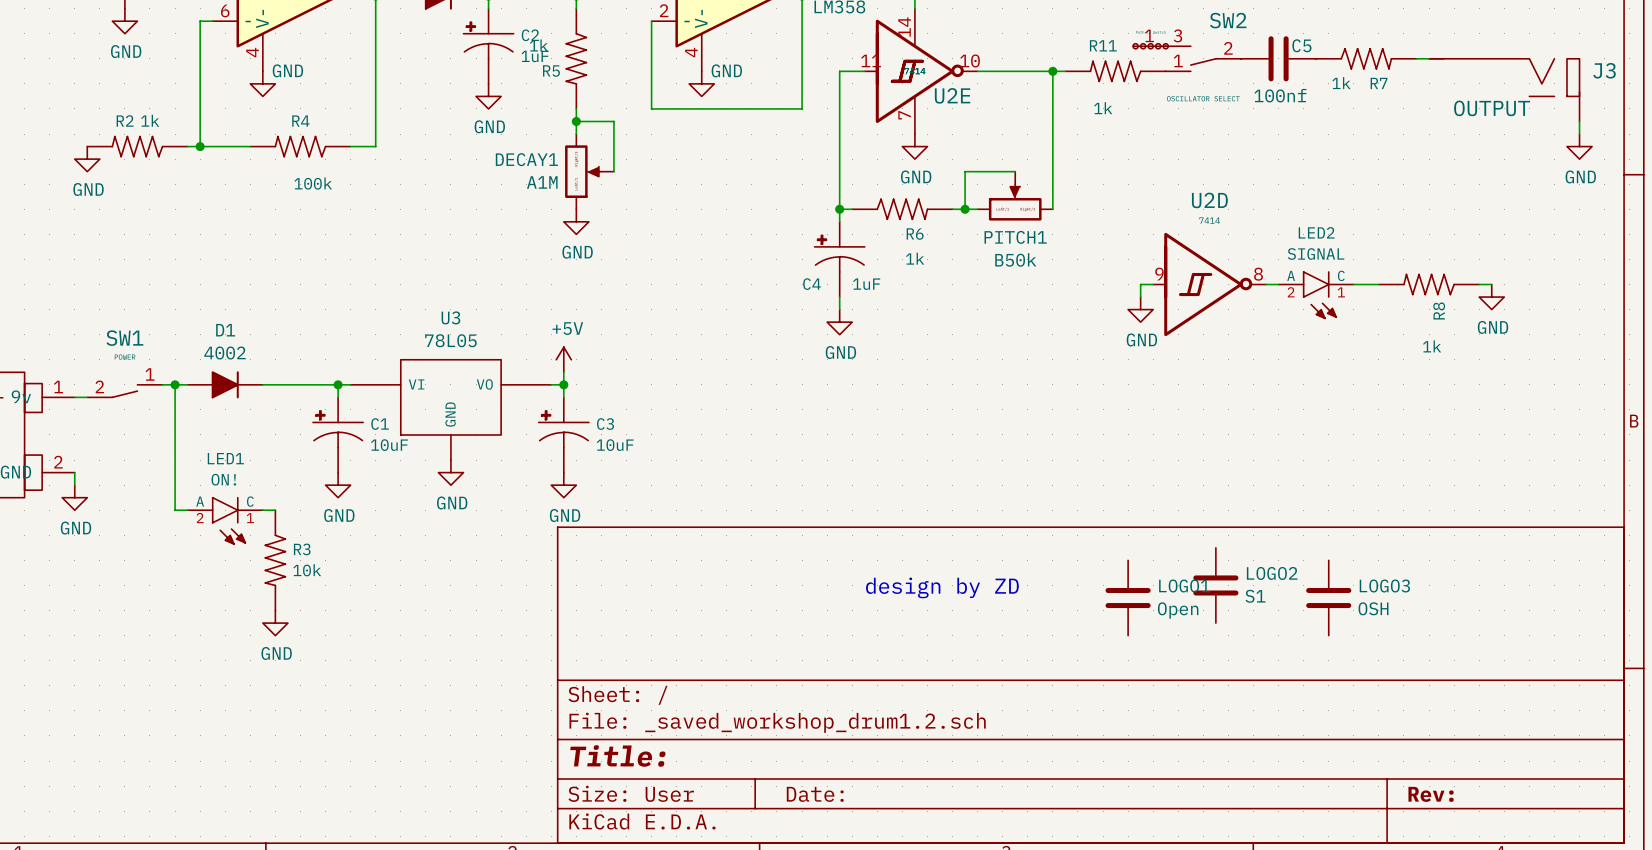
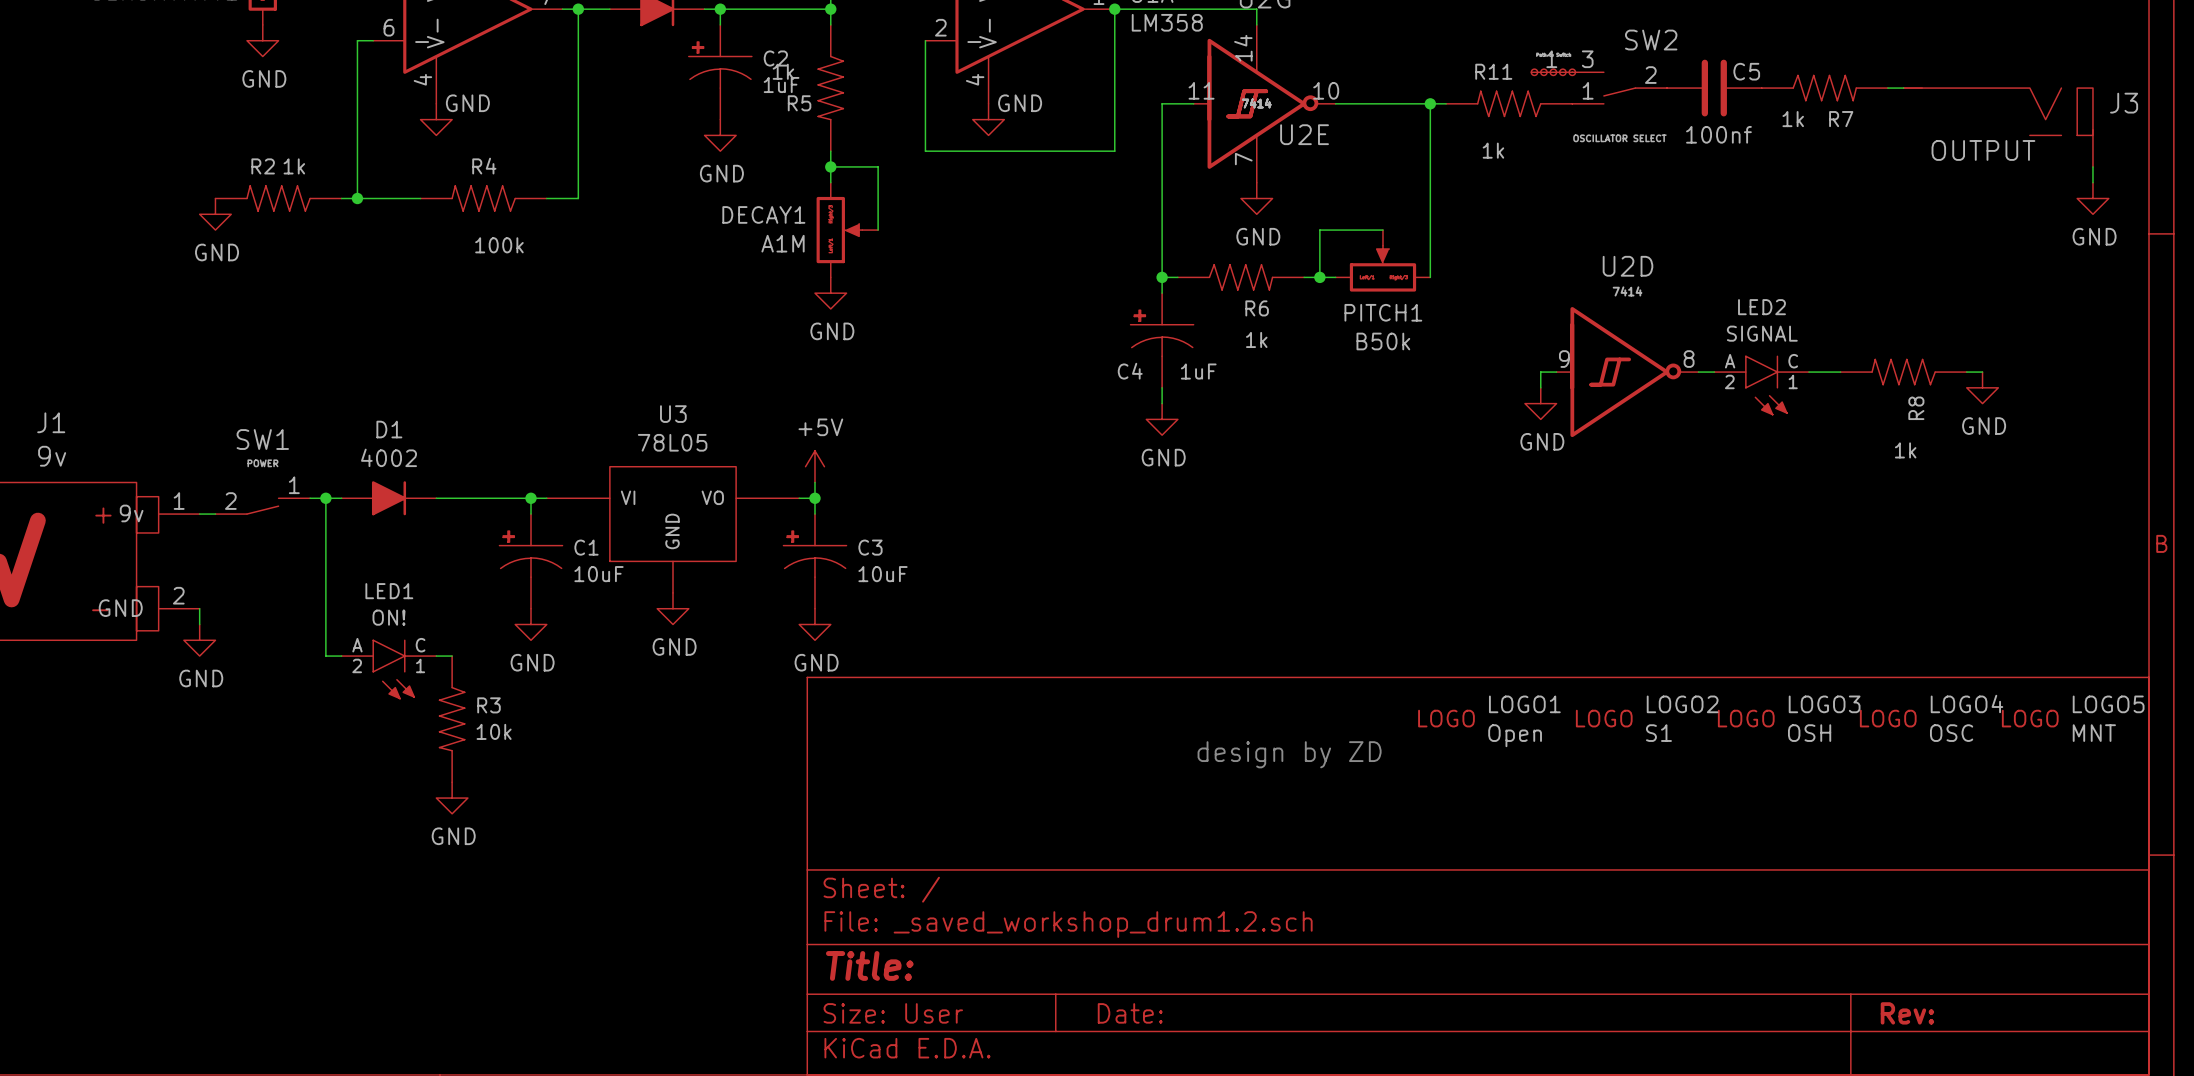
LOGO2 symbol: [1193, 547, 1239, 624] -> [1575, 695, 1719, 742]
LOGO5: none -> MNT (2073, 718)
LOGO1 symbol: [1105, 560, 1151, 636] -> [1418, 695, 1561, 748]
LOGO3 symbol: [1306, 560, 1352, 636] -> [1717, 695, 1861, 742]
LOGO4: none -> OSC (1931, 718)
LOGO2 name position: LOGO2 (1272, 573) -> LOGO2 (1682, 704)
LOGO1 name position: LOGO1 (1184, 586) -> LOGO1 (1524, 704)
LOGO3 name position: LOGO3 (1384, 586) -> LOGO3 (1824, 704)
LOGO2 value position: S1 (1255, 596) -> S1 (1658, 733)
LOGO3 value position: OSH (1373, 608) -> OSH (1809, 733)
LOGO1 value position: Open (1178, 610) -> Open (1515, 735)

